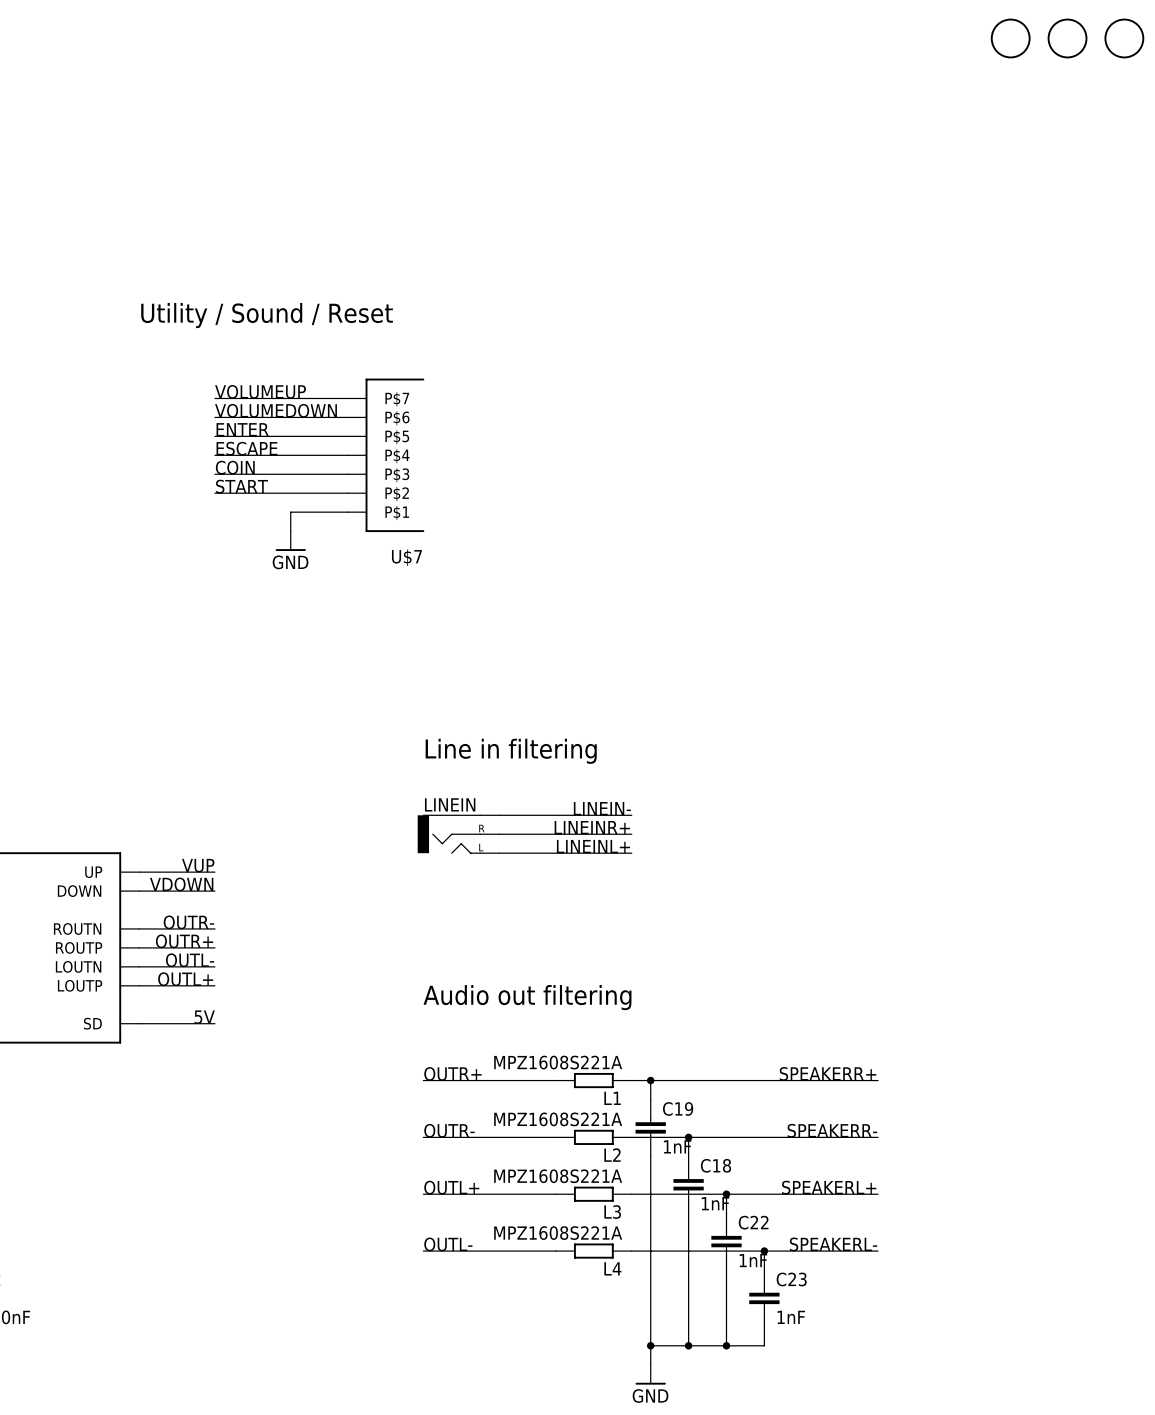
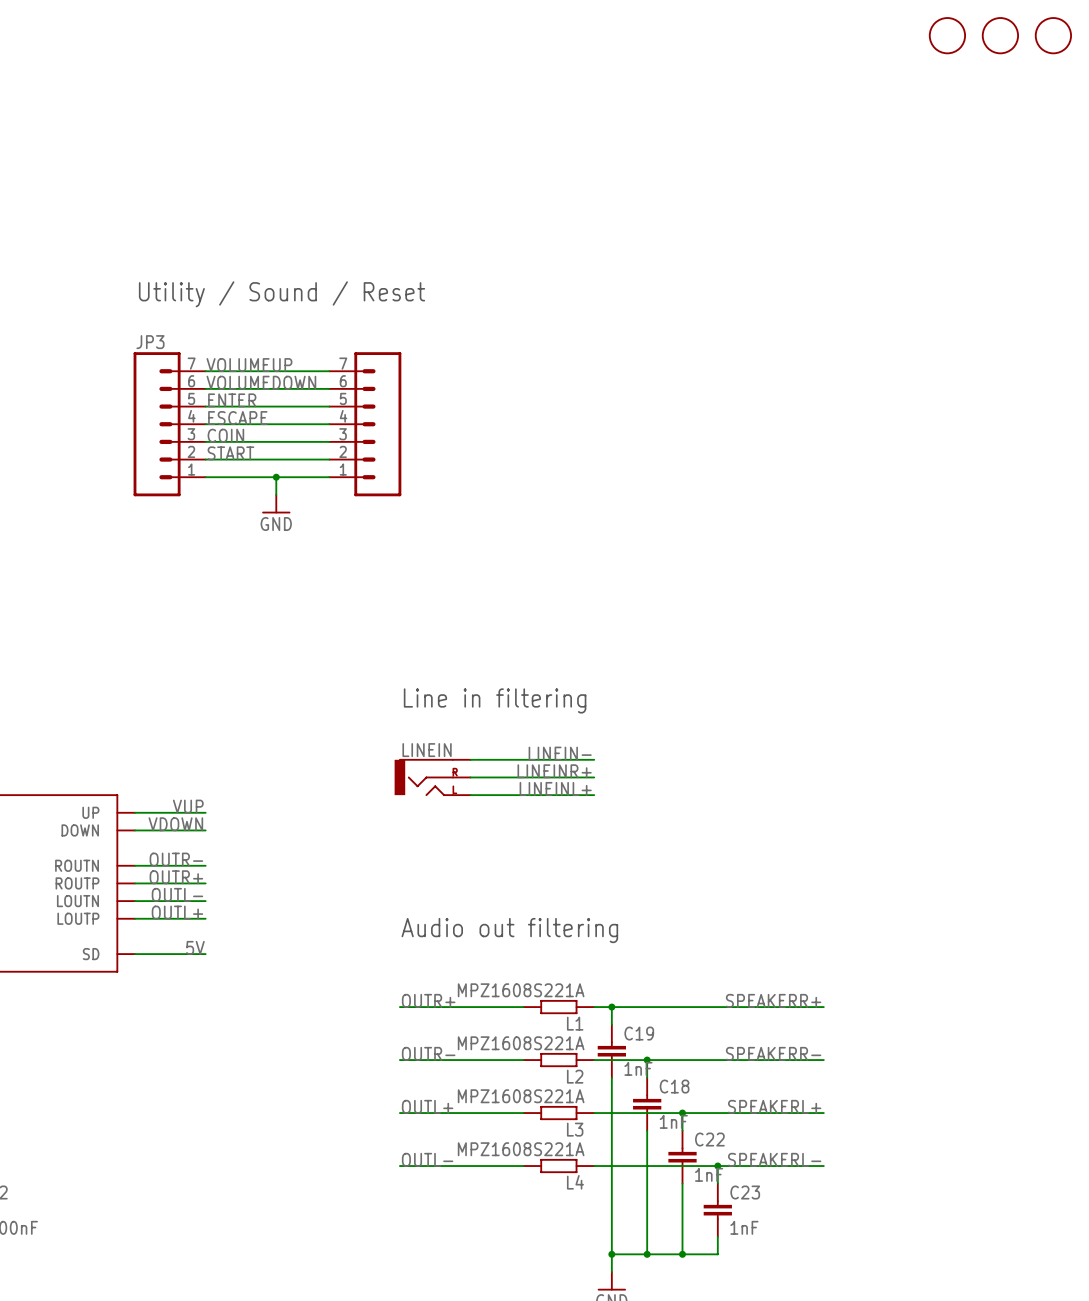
JP3: none -> (169, 424)
U$7: (385, 455) -> none
part: none -> (365, 424)
wire: none -> (205, 477) (276, 477)
junction: none -> (276, 477)

